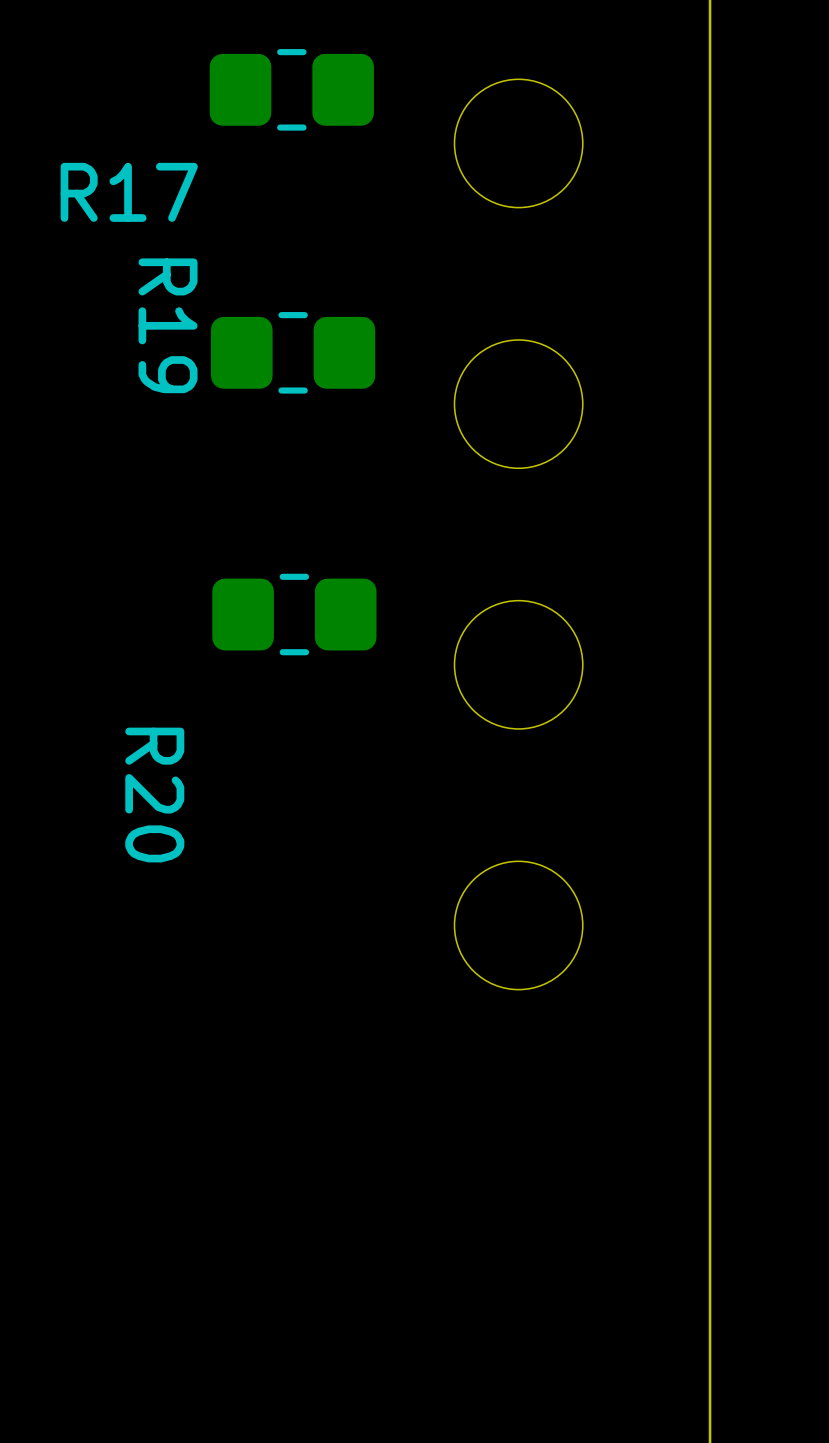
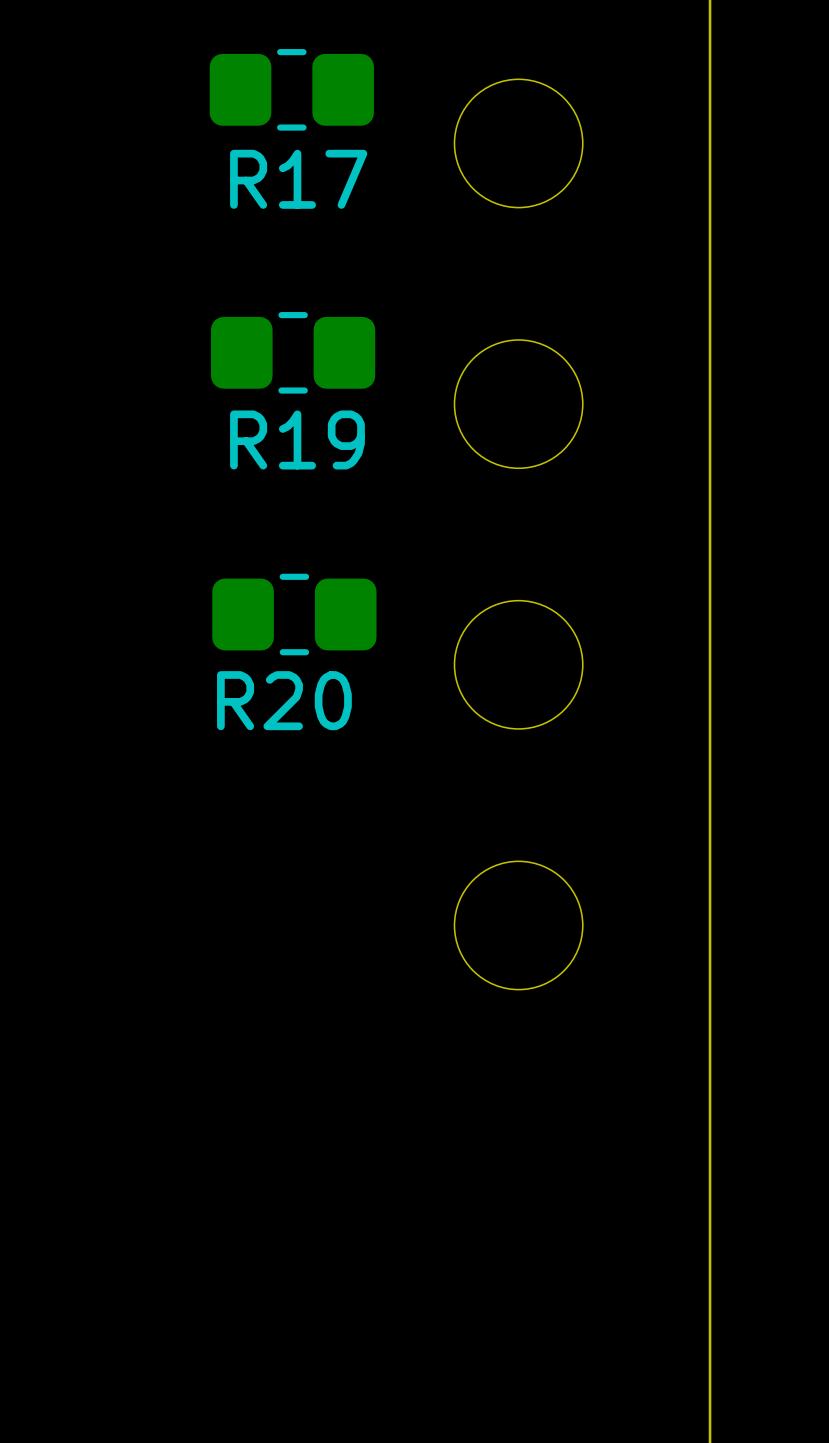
R17 name position: R17 (129, 192) -> R17 (298, 179)
R19 name rotation: 0° (168, 325) -> 90° counterclockwise (297, 439)
R20 name rotation: 0° (154, 795) -> 90° counterclockwise (284, 700)

